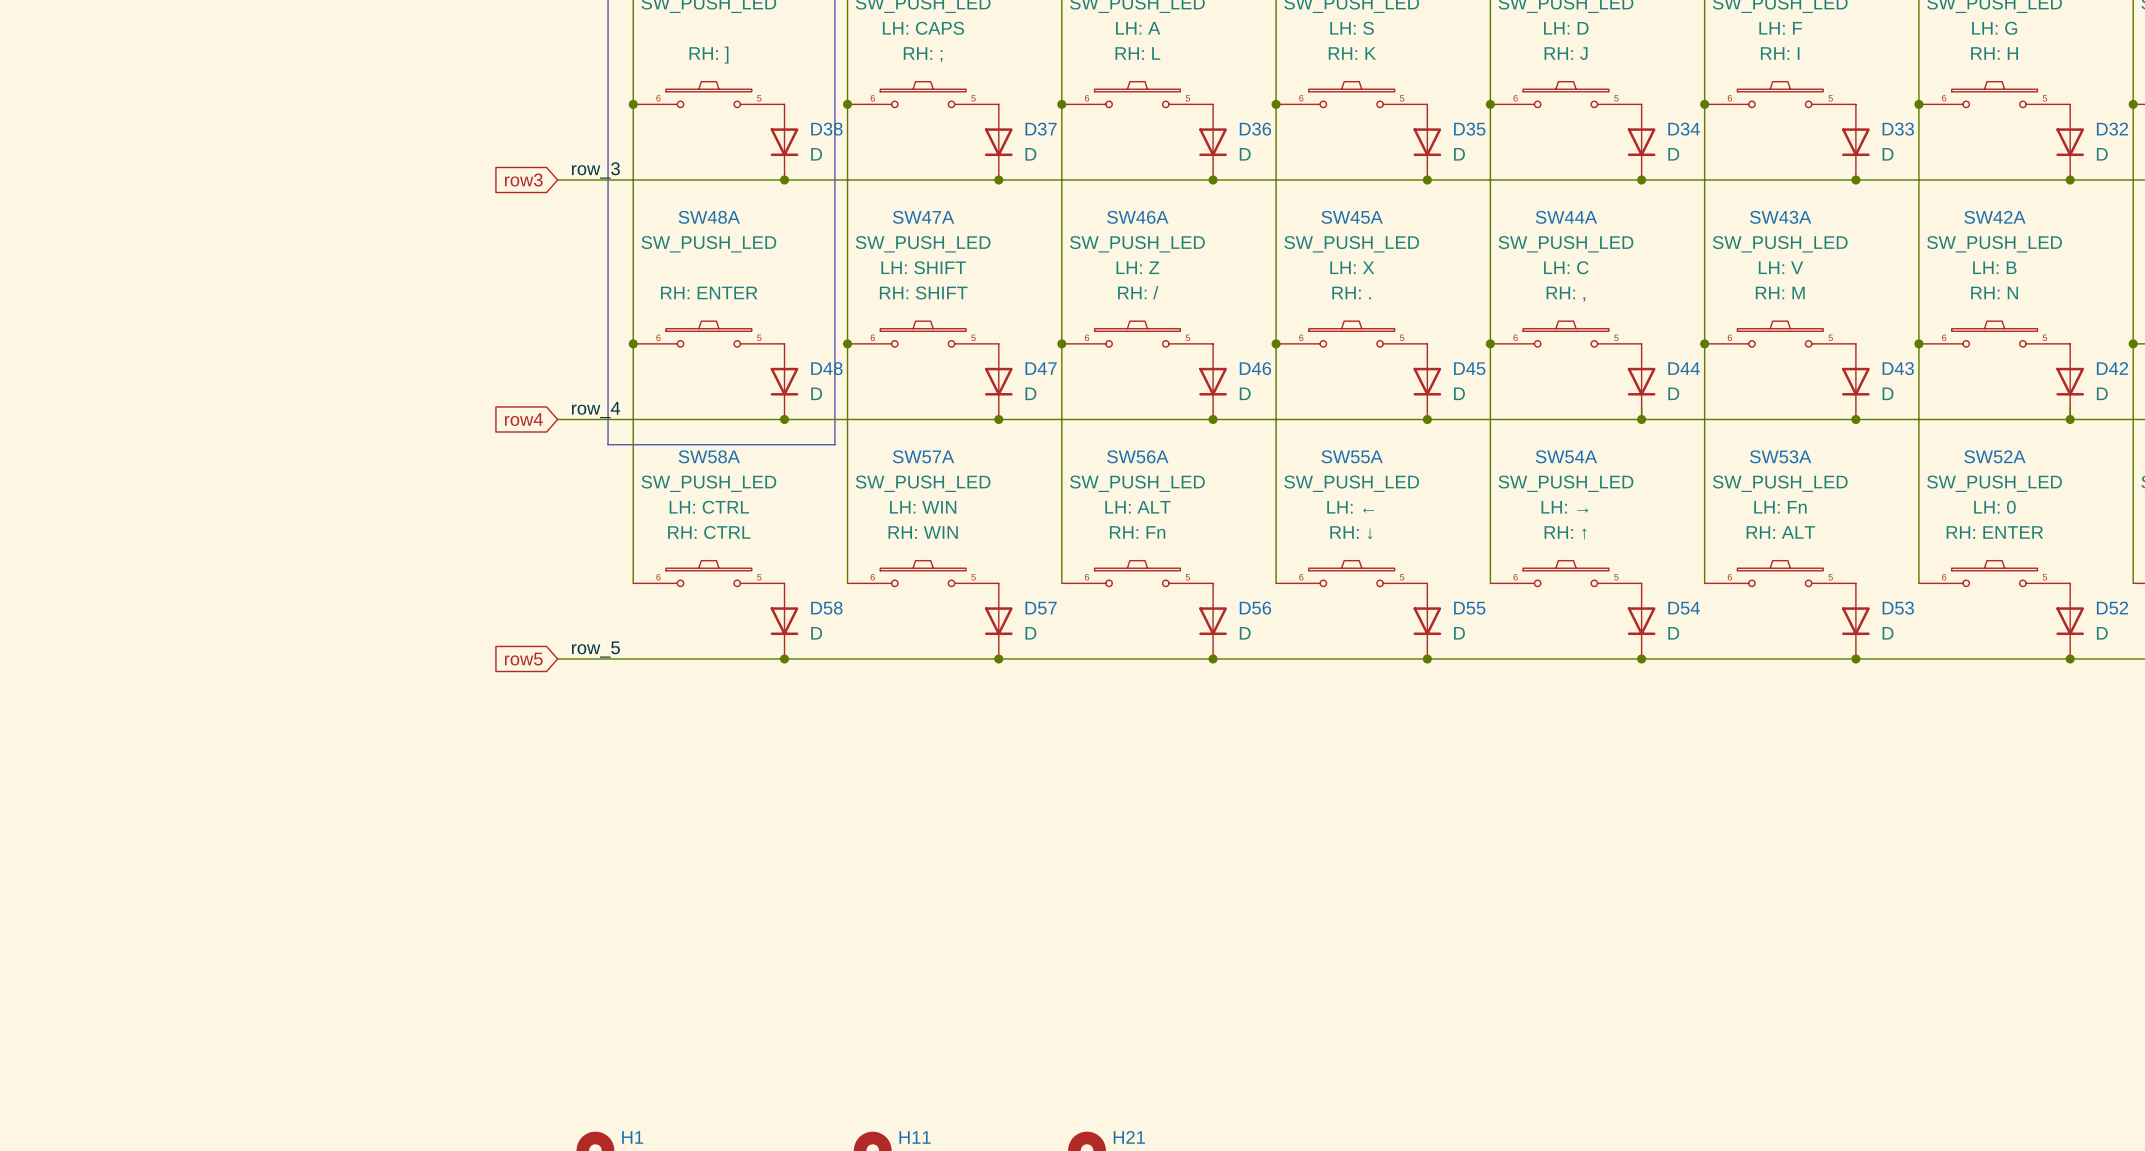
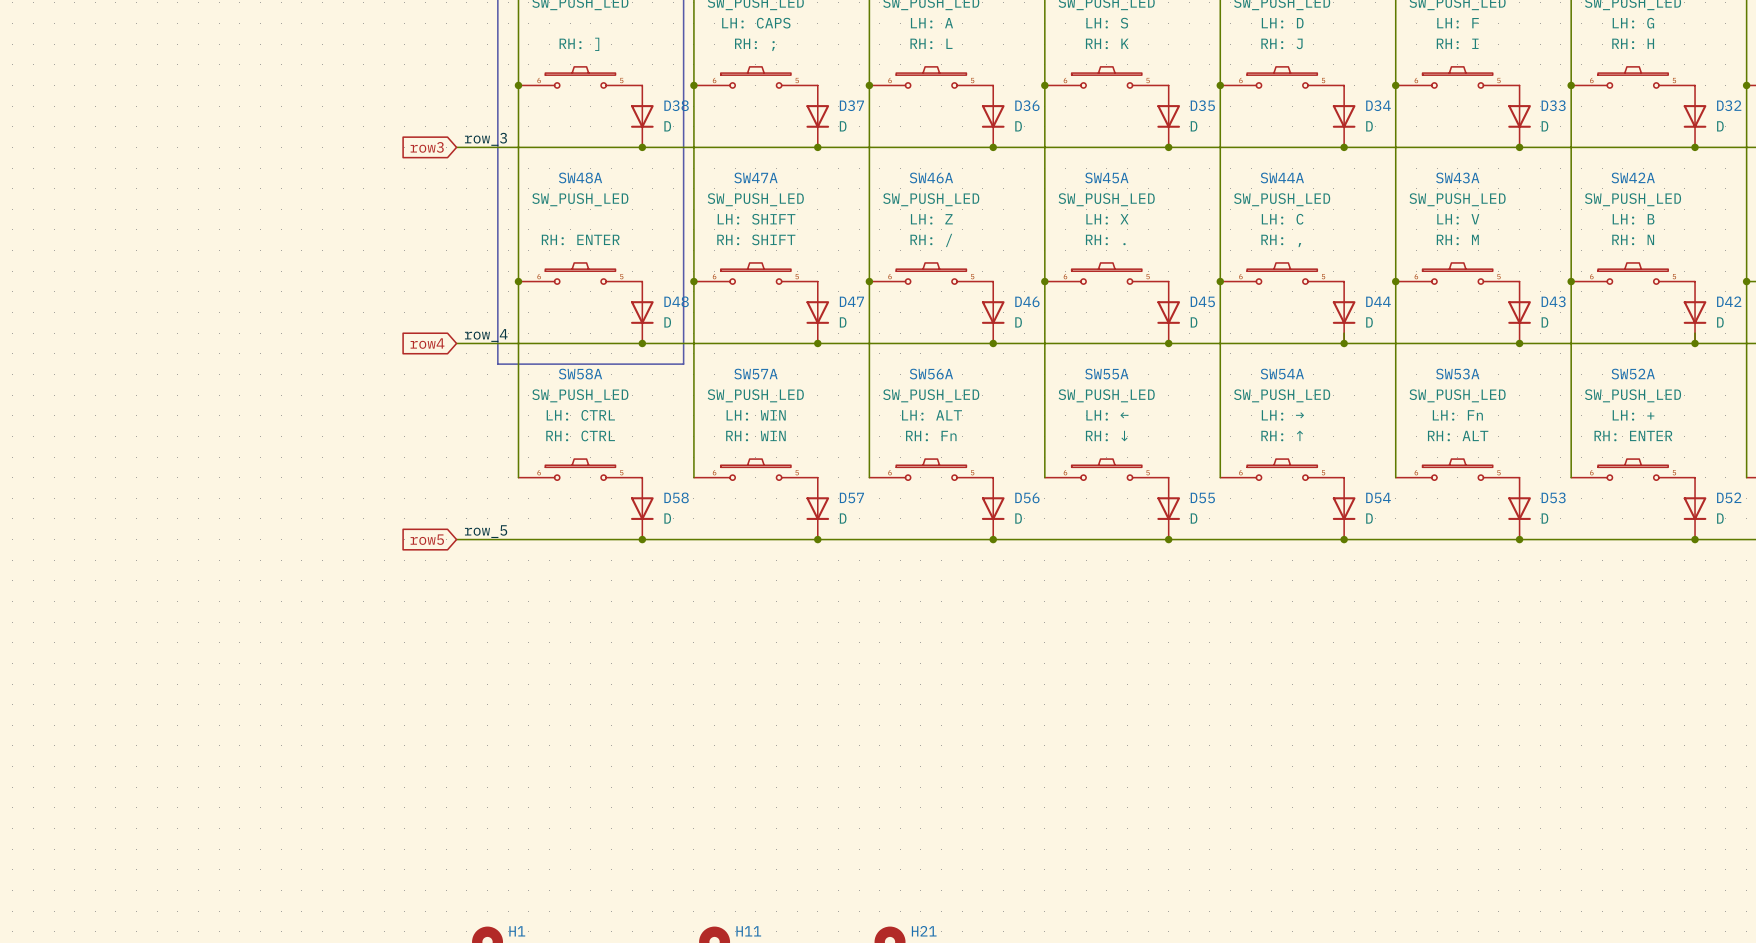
SW52A text: LH: 0 (1994, 507) -> LH: + (1633, 415)

